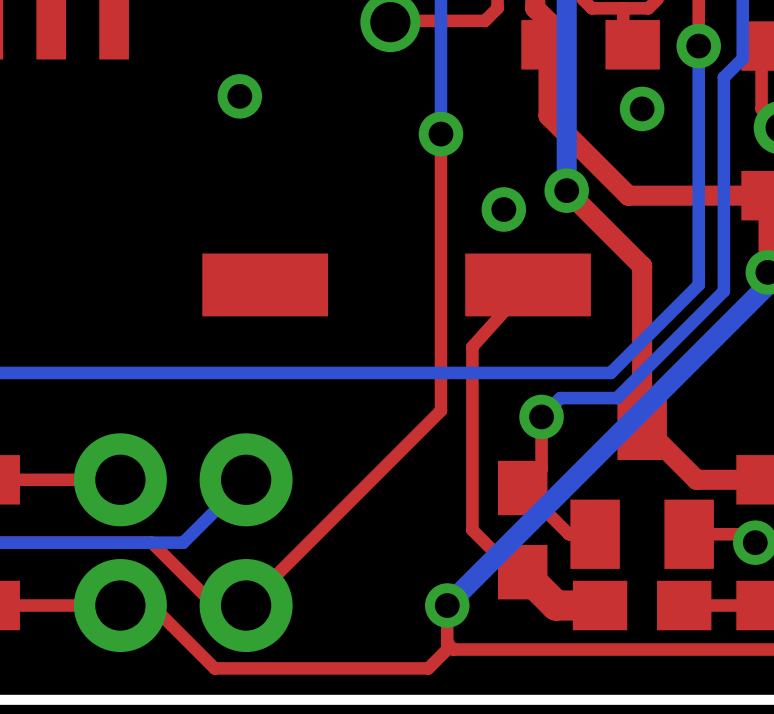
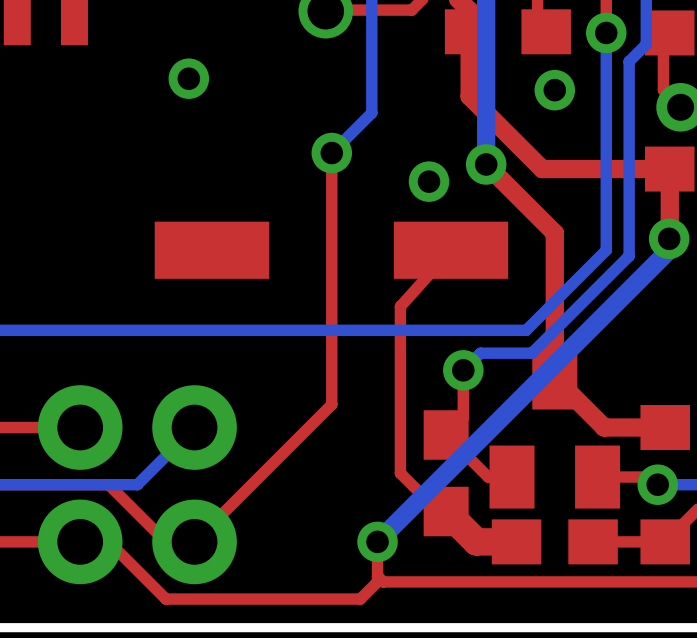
top track: (440, 134) (440, 410) (396, 454) -> (331, 153) (331, 404)
bottom track: none -> (371, 113) (331, 153)
via position: (440, 134) -> (331, 153)

